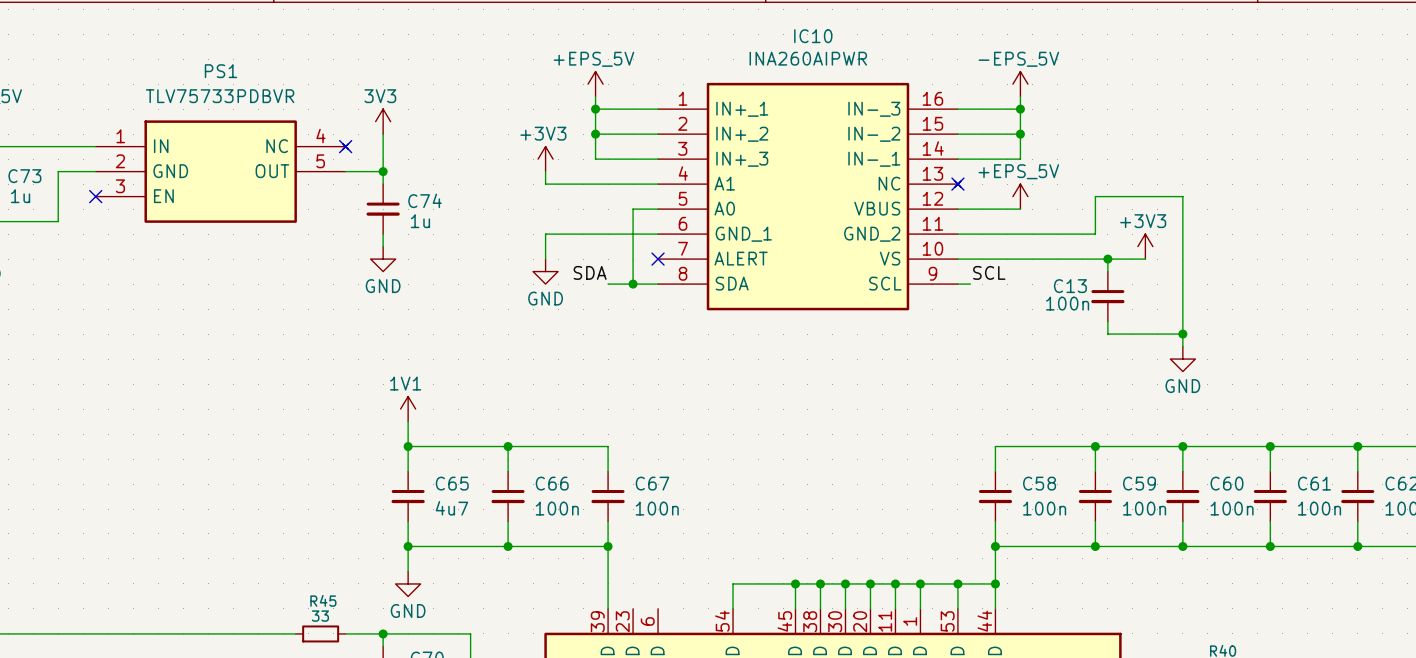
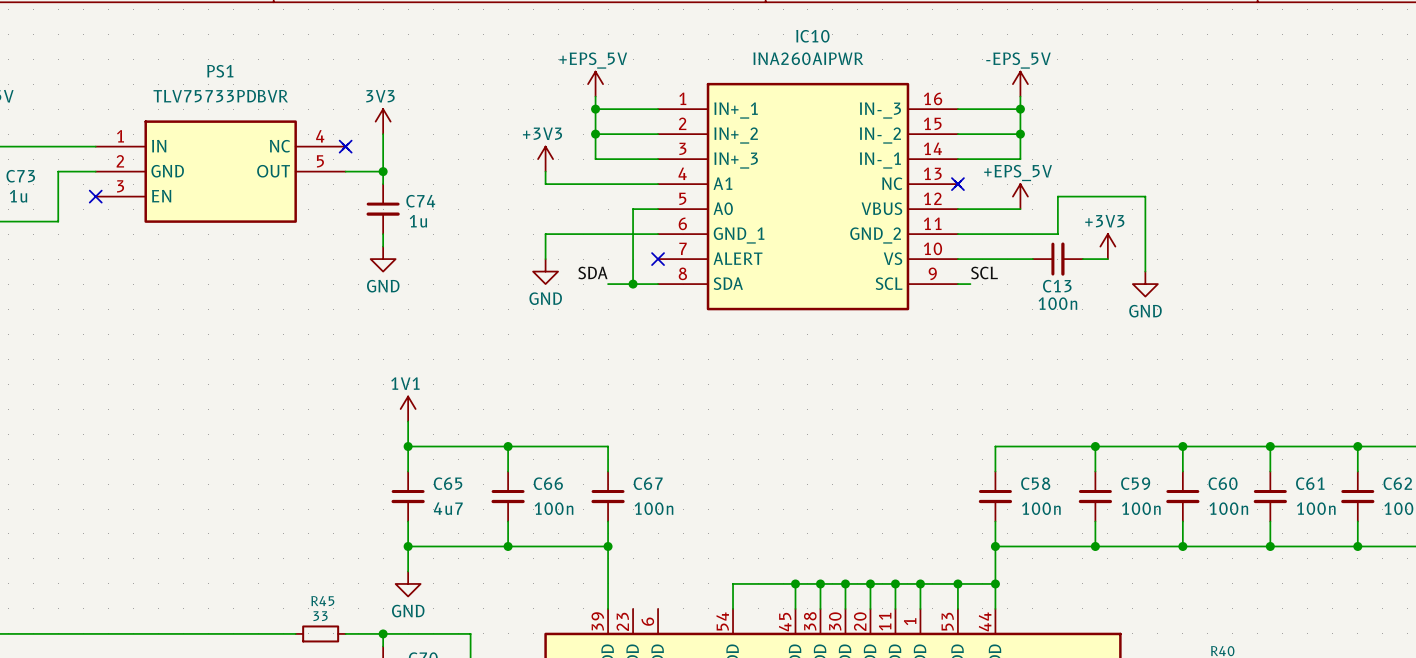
wire: (1095, 196) (1095, 234) (1057, 234) -> (1095, 196) (1057, 196) (1057, 234)
wire: (1145, 196) (1182, 196) (1182, 346) -> (1145, 196) (1145, 271)
power symbol position: +3V3 (1145, 246) -> +3V3 (1107, 246)
junction: (1107, 259) -> none
wire: (1145, 259) (1107, 259) (1107, 271) -> none
C13 rotation: 0° (1107, 296) -> 90° counterclockwise (1057, 259)
C13 position: (1107, 296) -> (1057, 259)
wire: (1107, 321) (1107, 334) (1182, 334) -> none
junction: (1182, 334) -> none
power symbol position: GND (1182, 359) -> GND (1145, 284)

